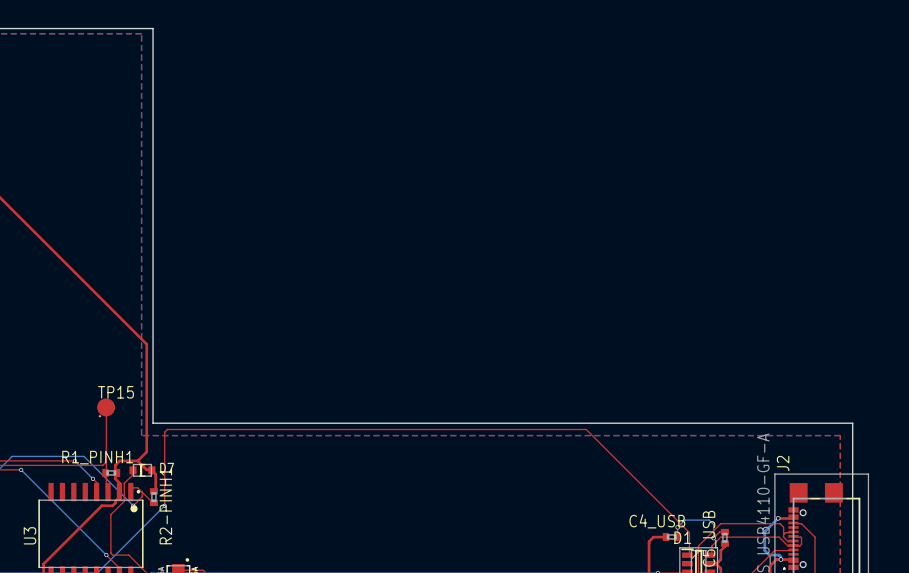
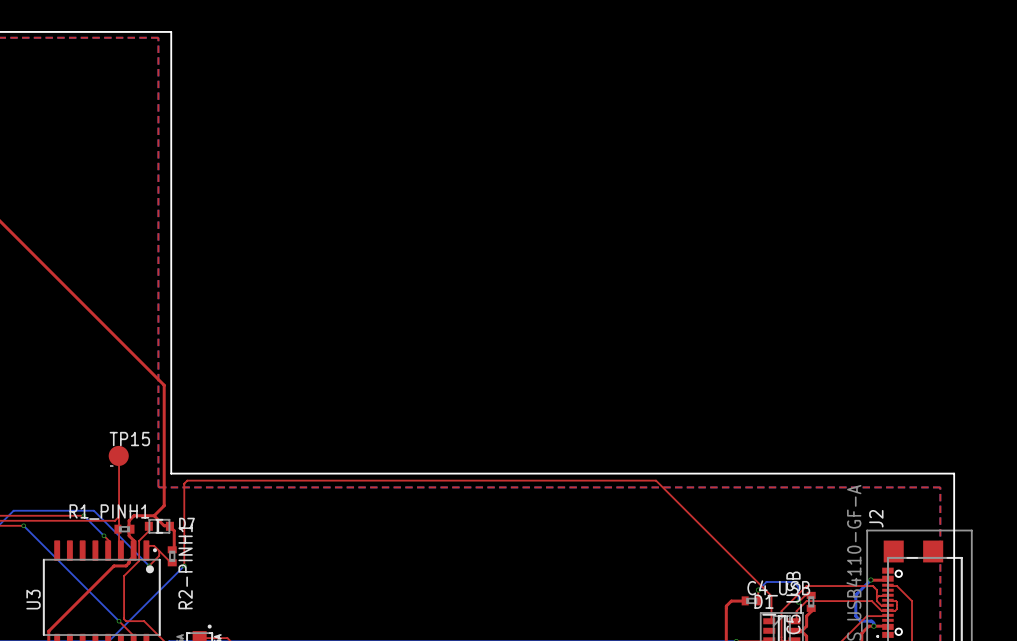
C4_USB name position: C4_USB (657, 521) -> C4_USB (778, 588)

